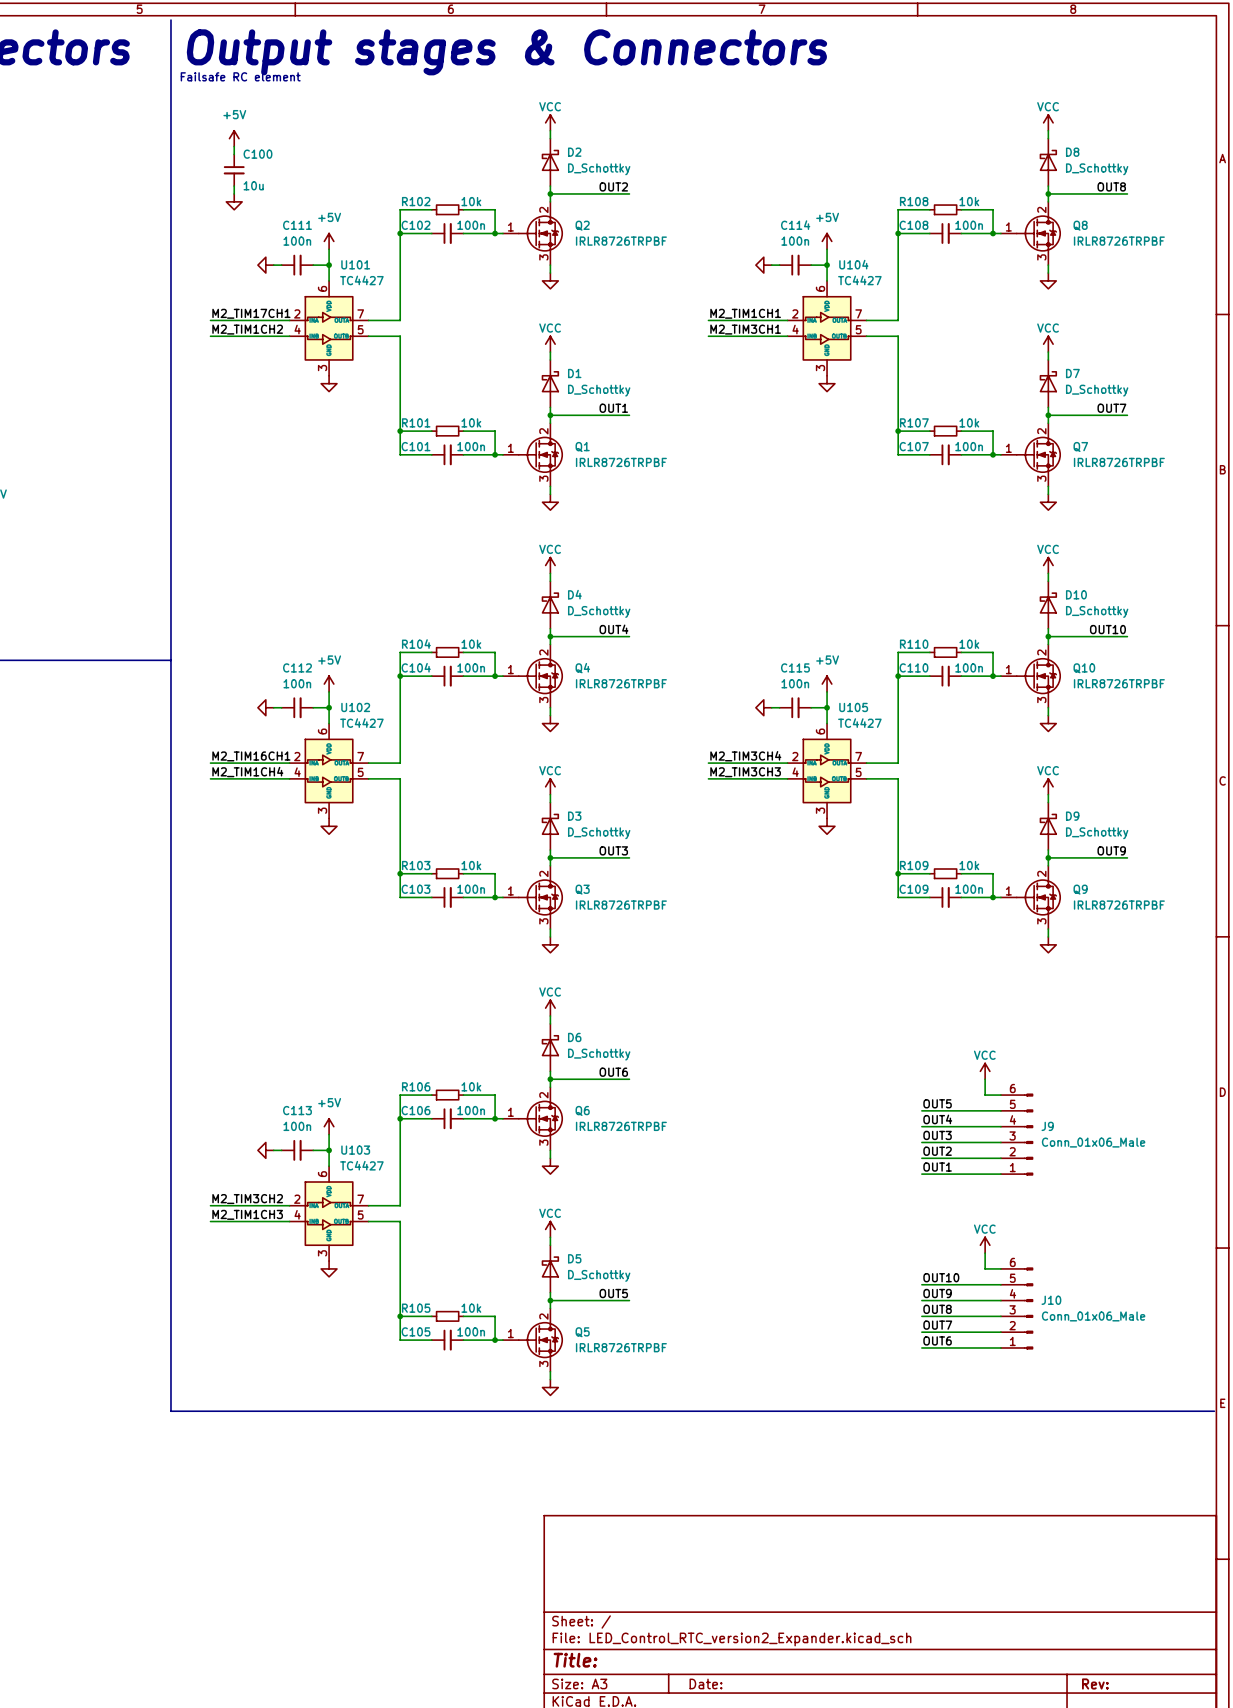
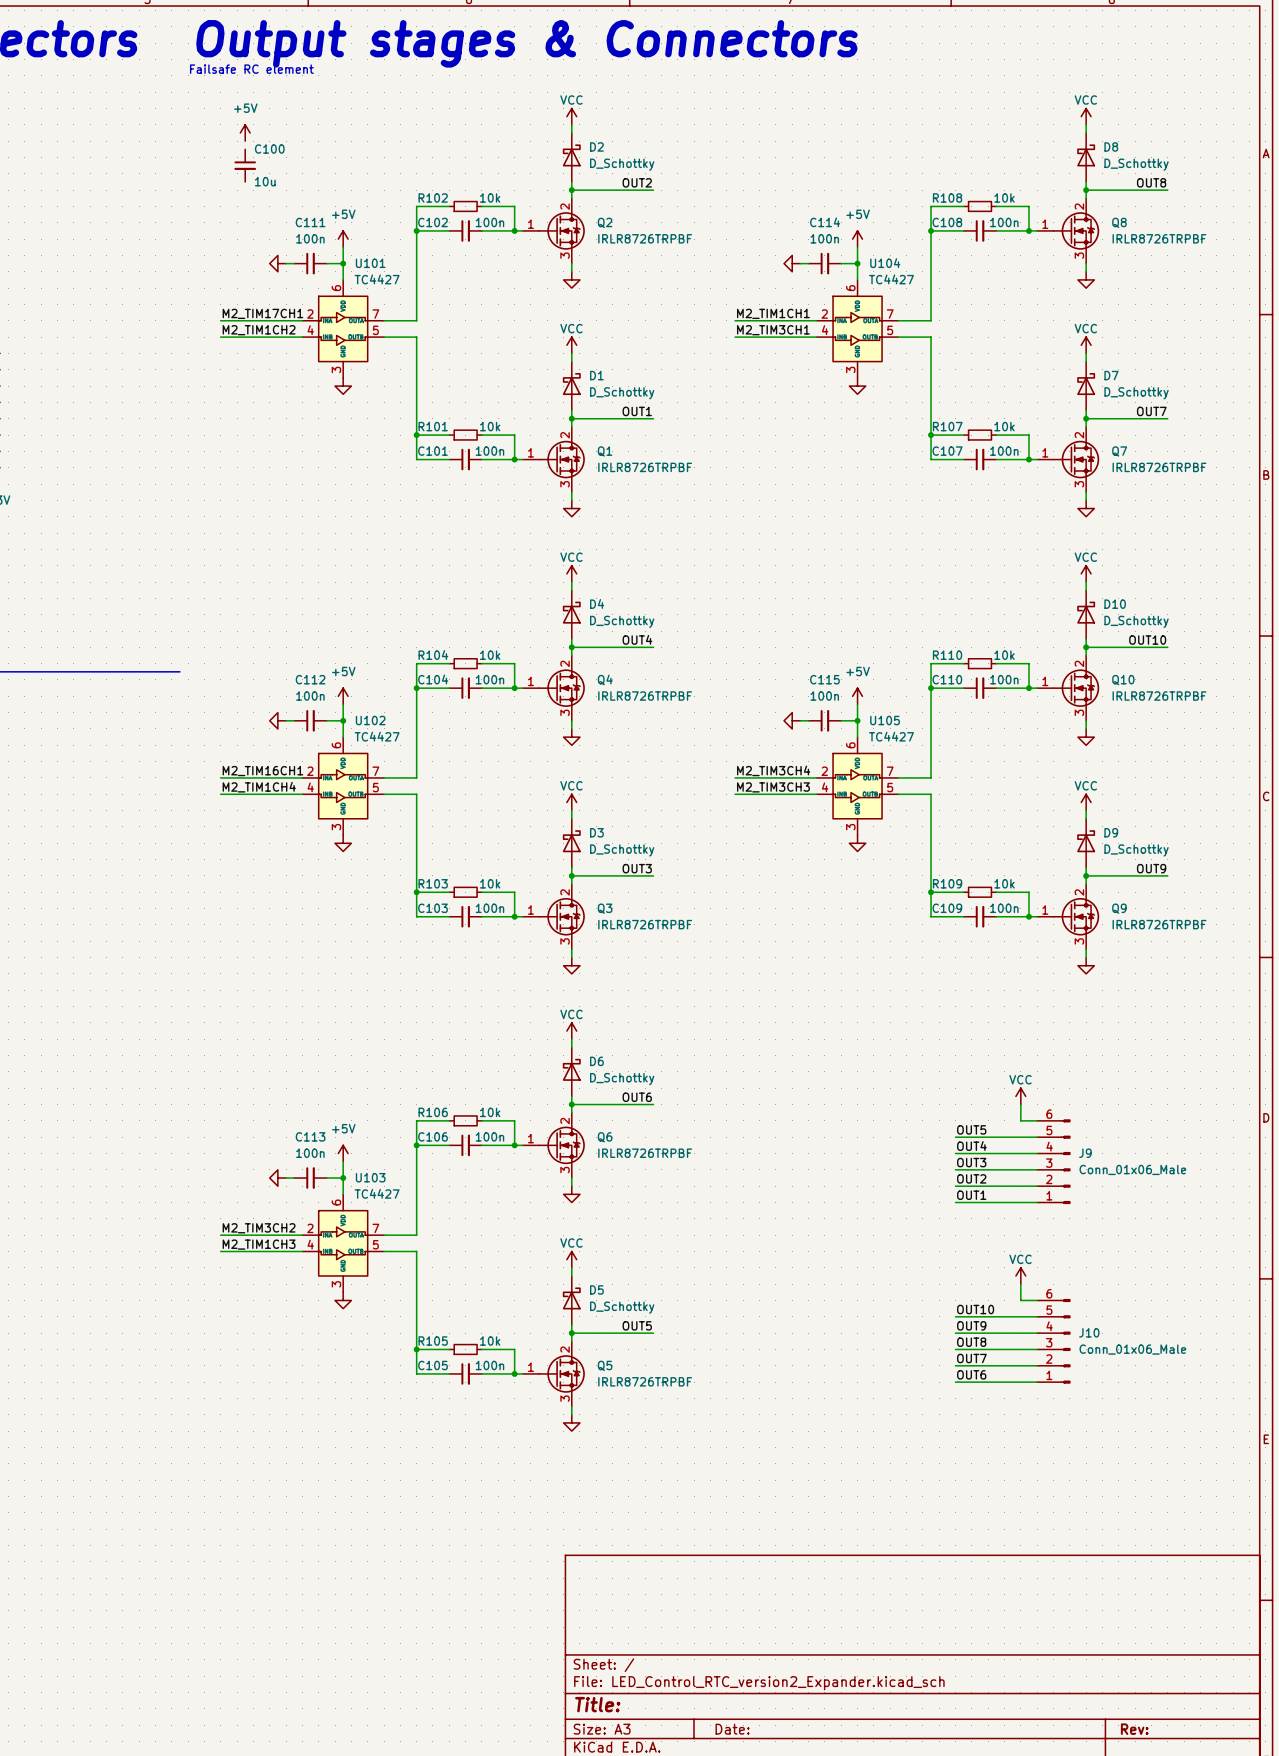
line: (170, 20) (170, 1411) (1214, 1411) -> none
wire: (234, 146) (234, 154) -> none
wire: (234, 186) (234, 193) -> none
power symbol: (234, 201) -> none

